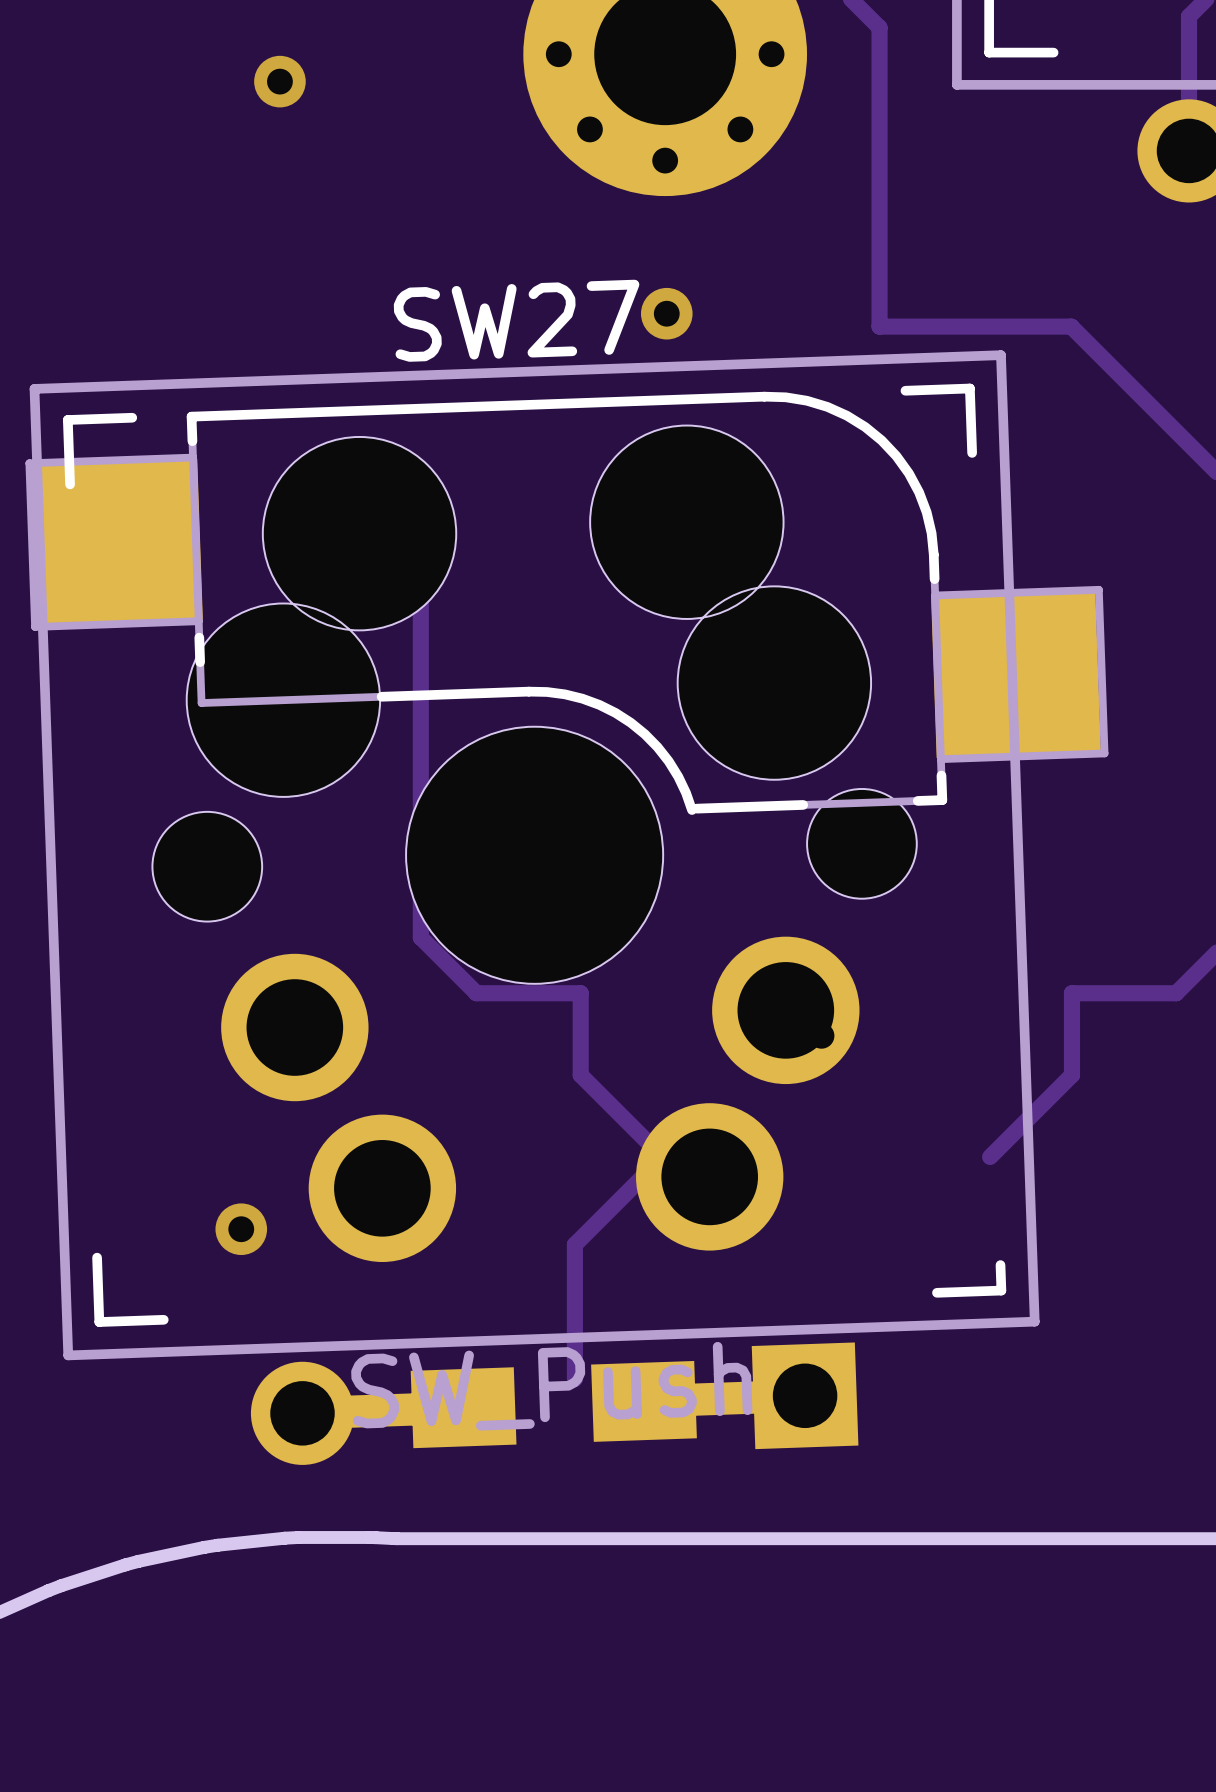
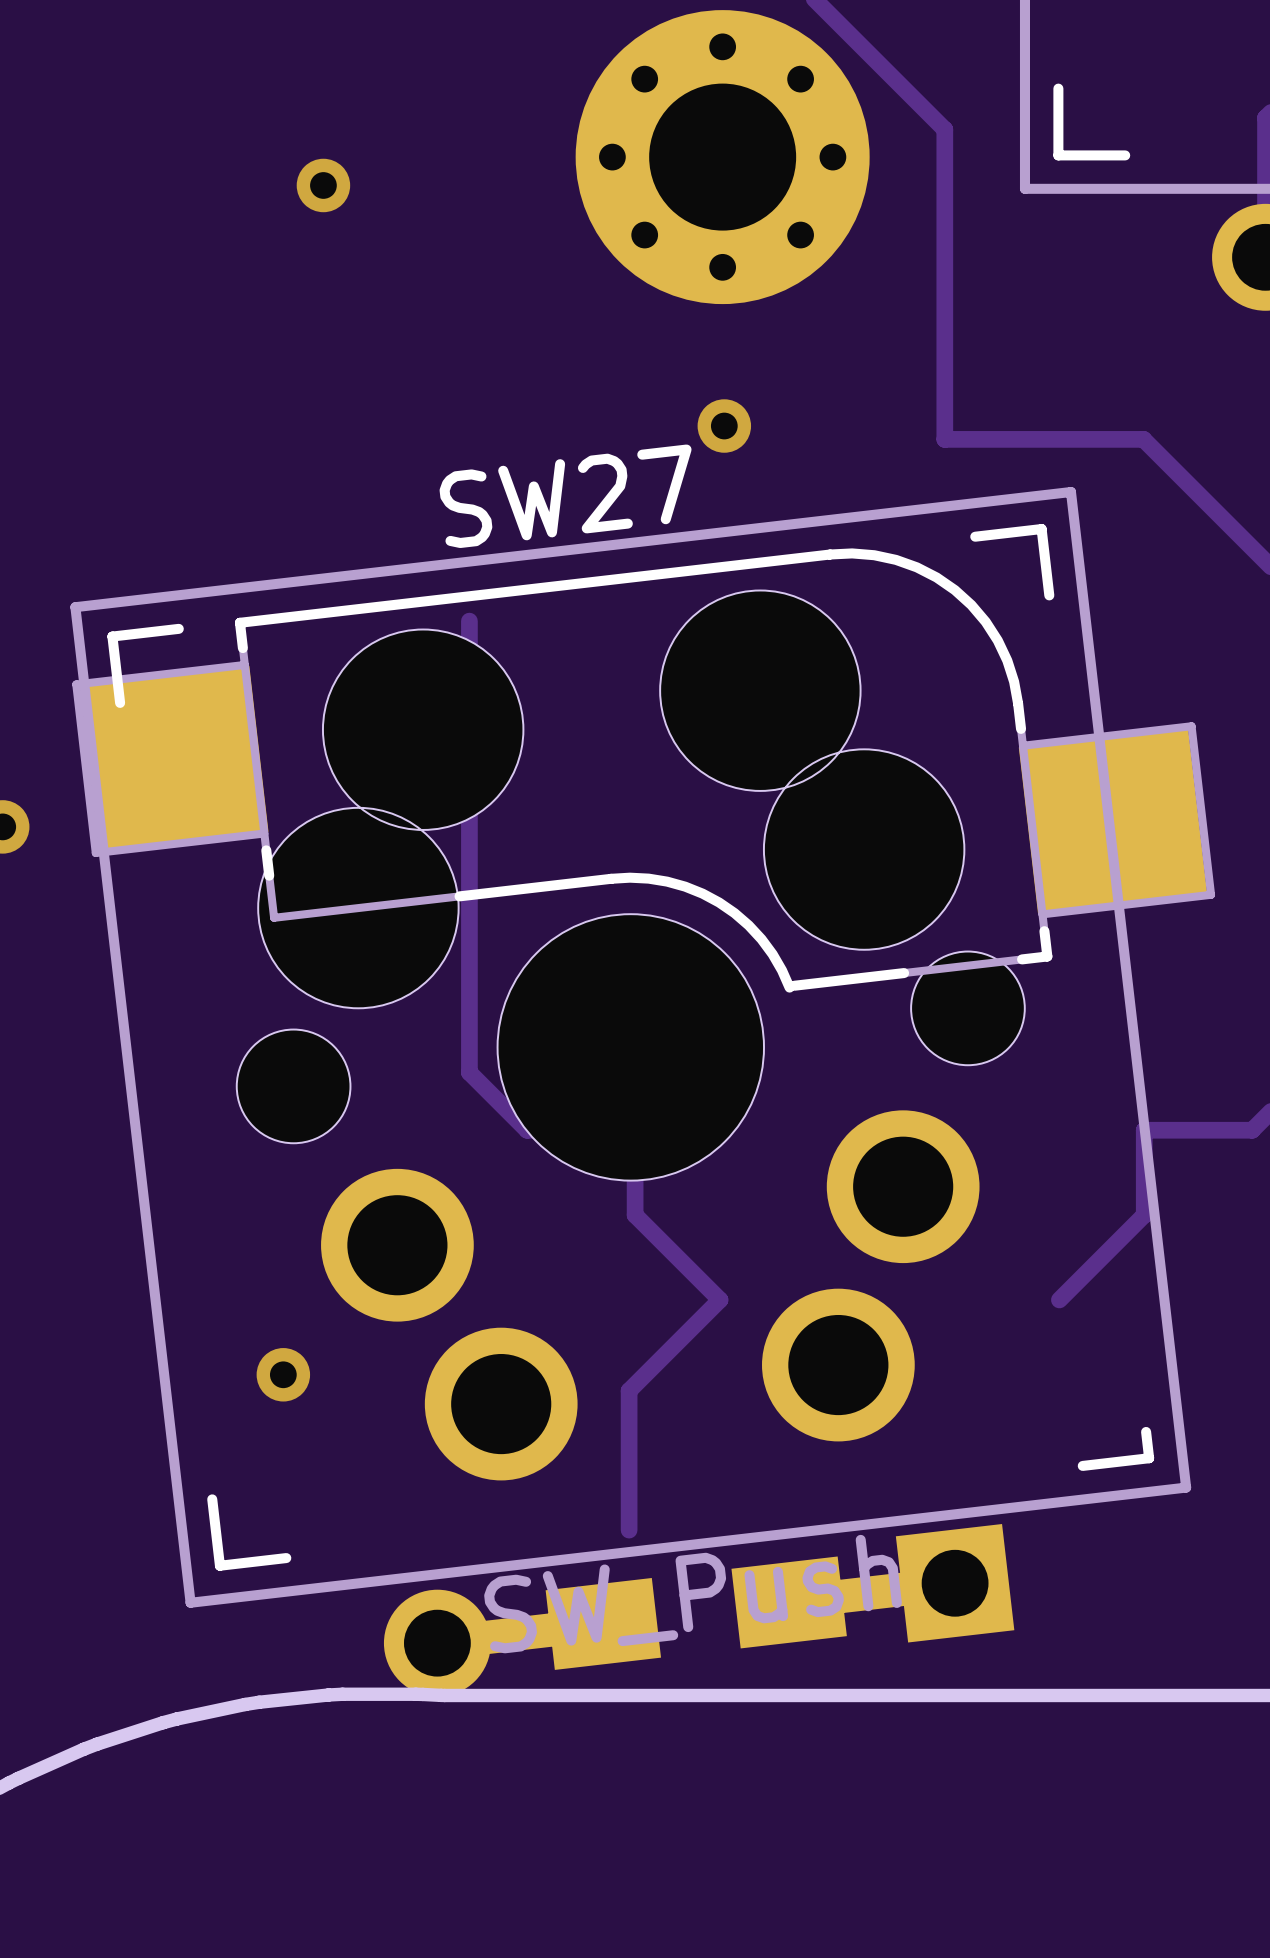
SW27 rotation: 0° (566, 855) -> 4.6° counterclockwise (642, 1047)
part: (554, 1403) -> none
part: none -> (699, 1610)

